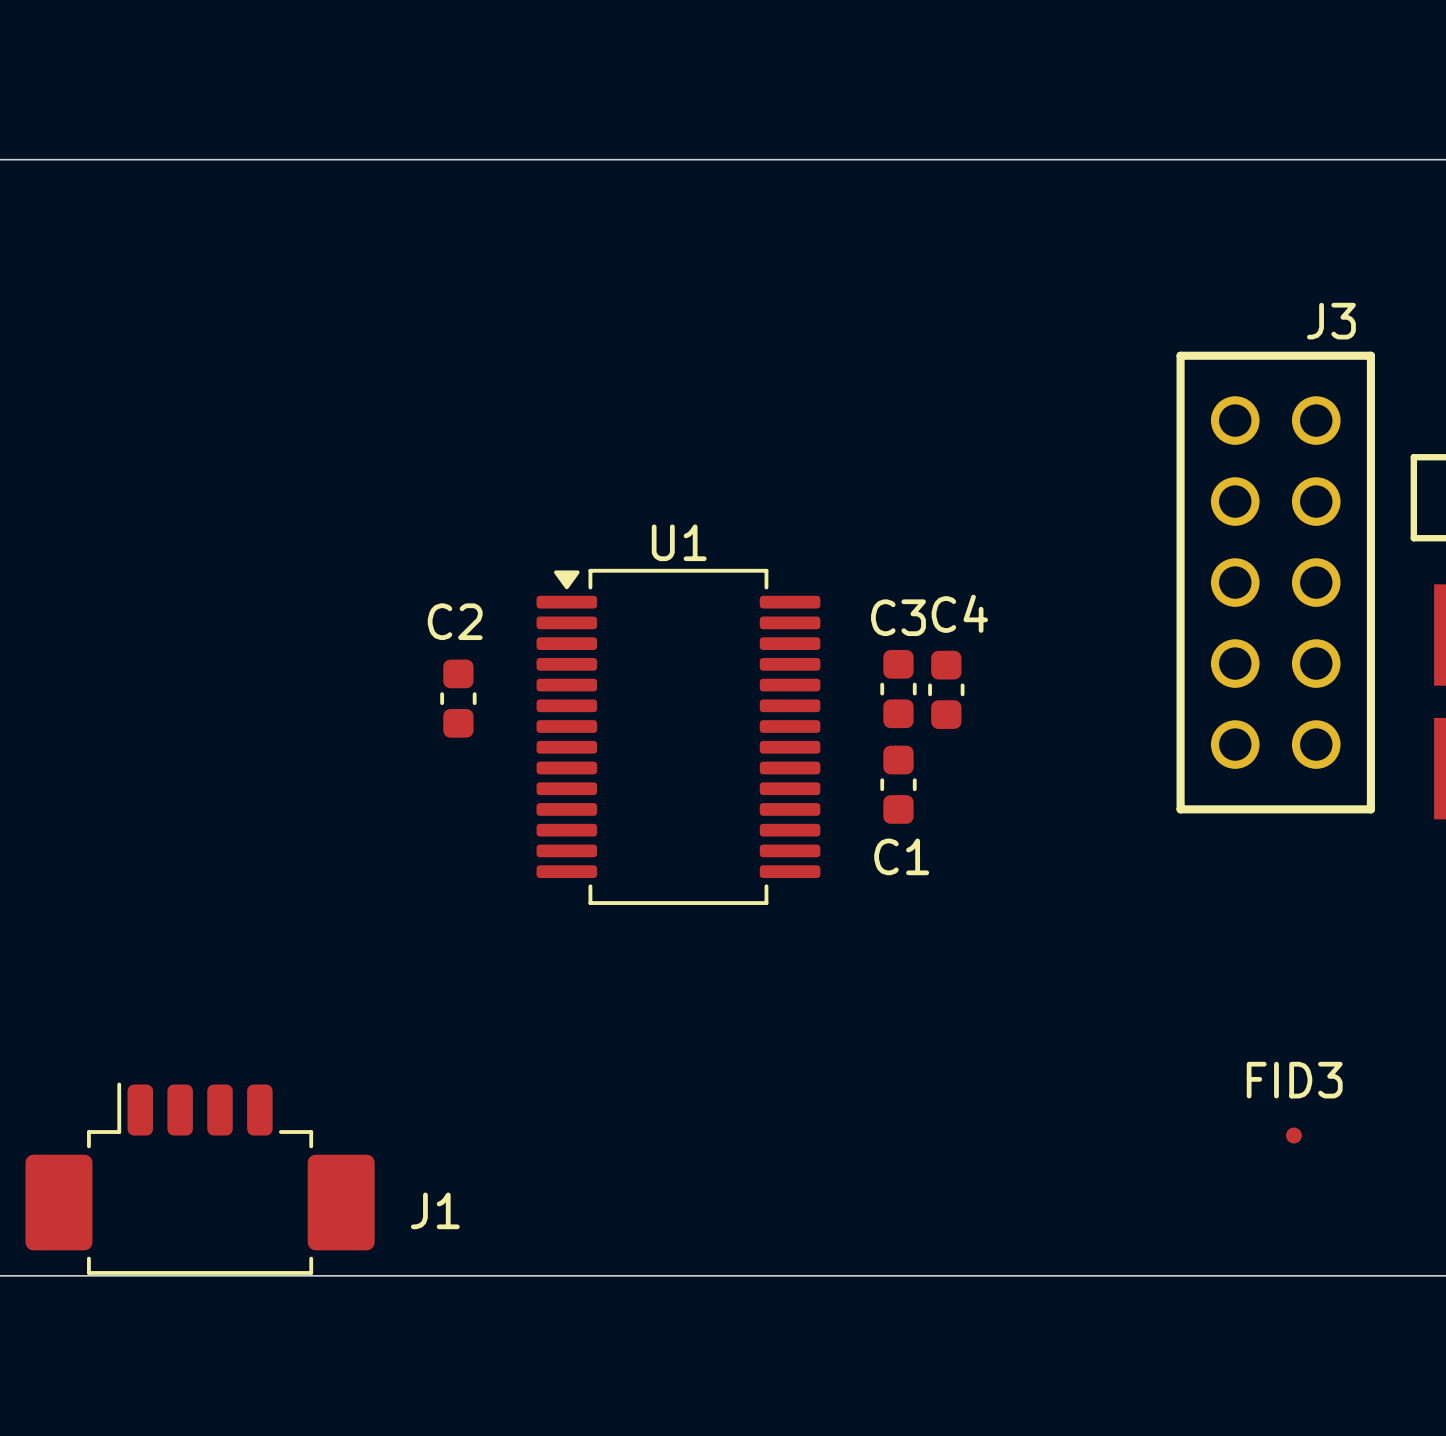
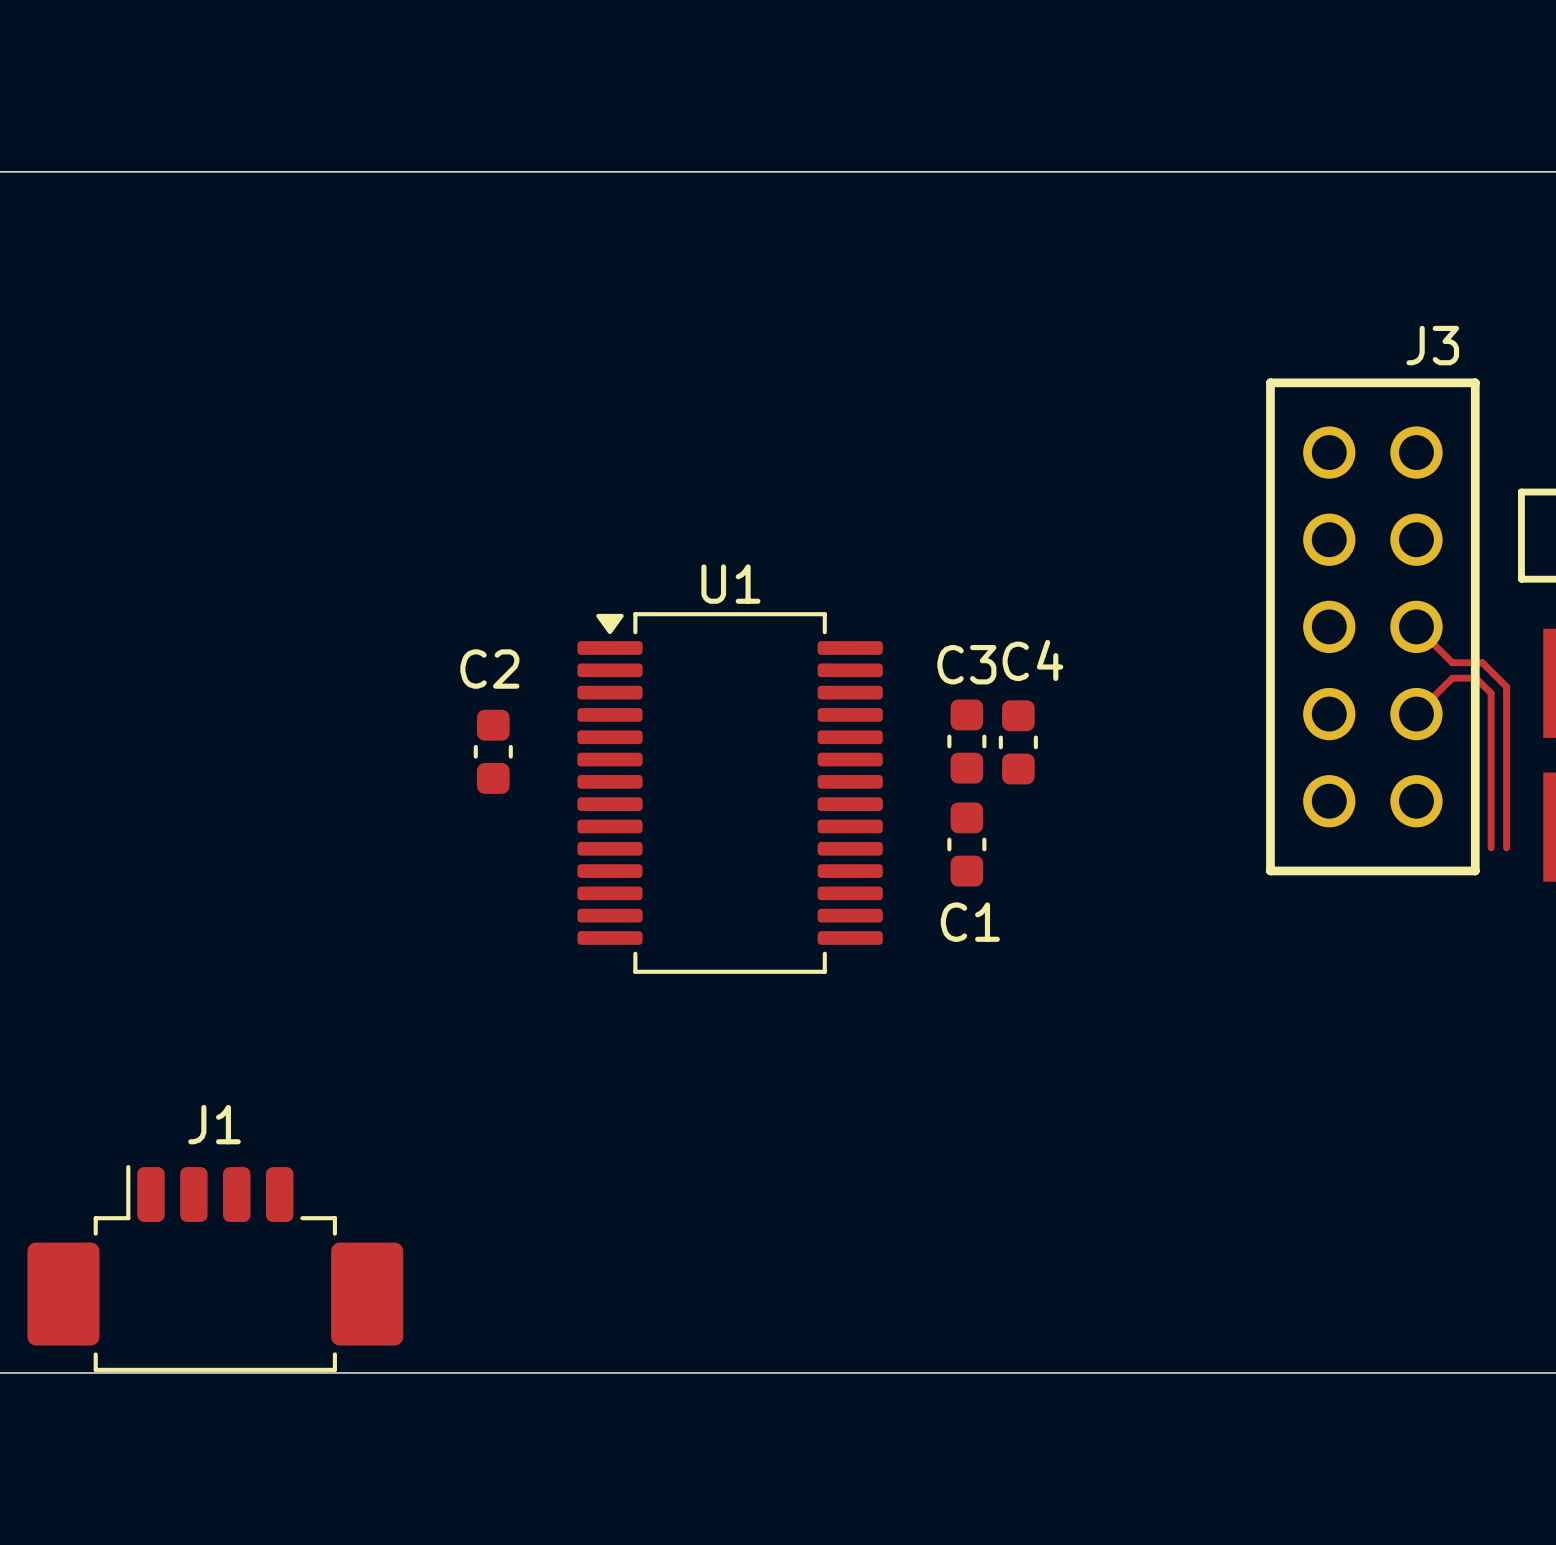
track: none -> (1416, 626) (1452, 662) (1482, 662) (1506, 686) (1506, 847)
track: none -> (1416, 714) (1452, 678) (1476, 678) (1491, 693) (1491, 847)
FID3: (1293, 1135) -> none
J1 name position: J1 (435, 1210) -> J1 (214, 1124)

